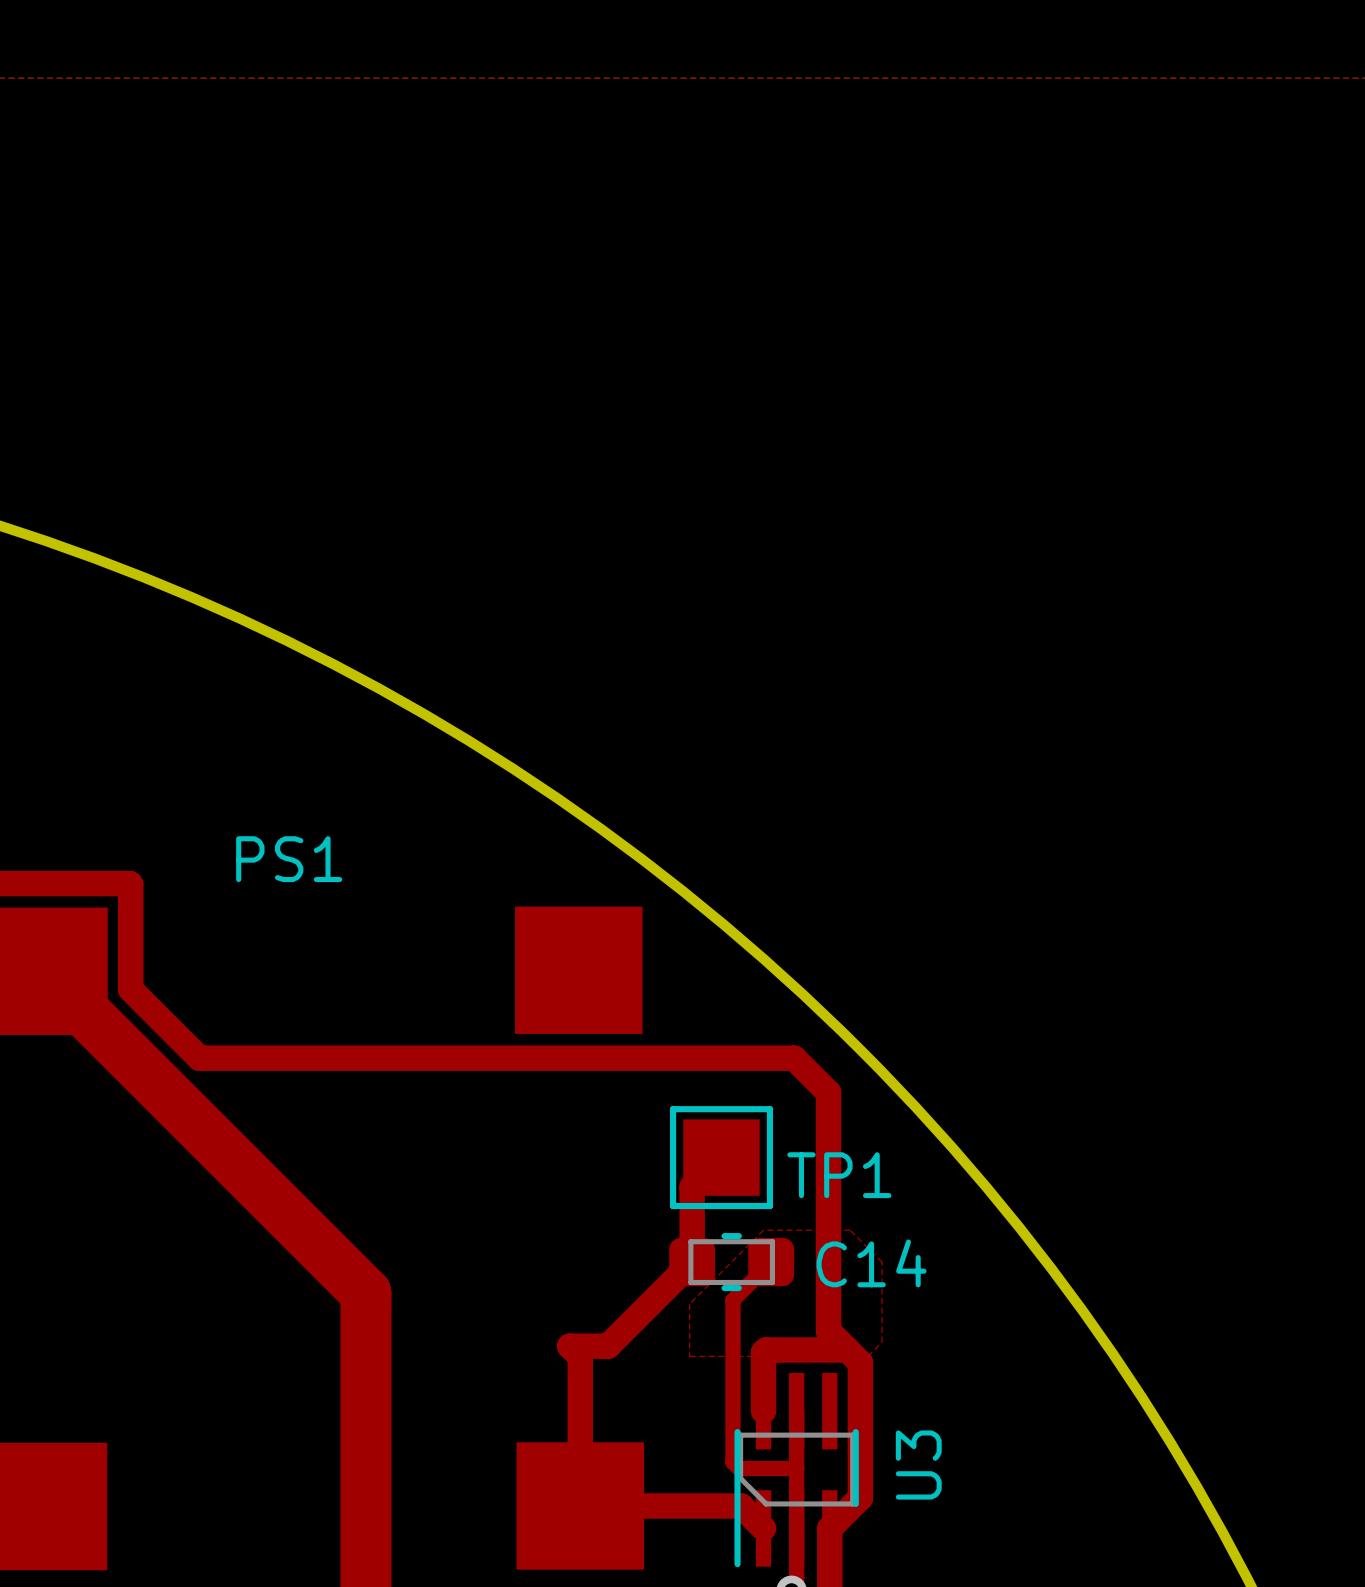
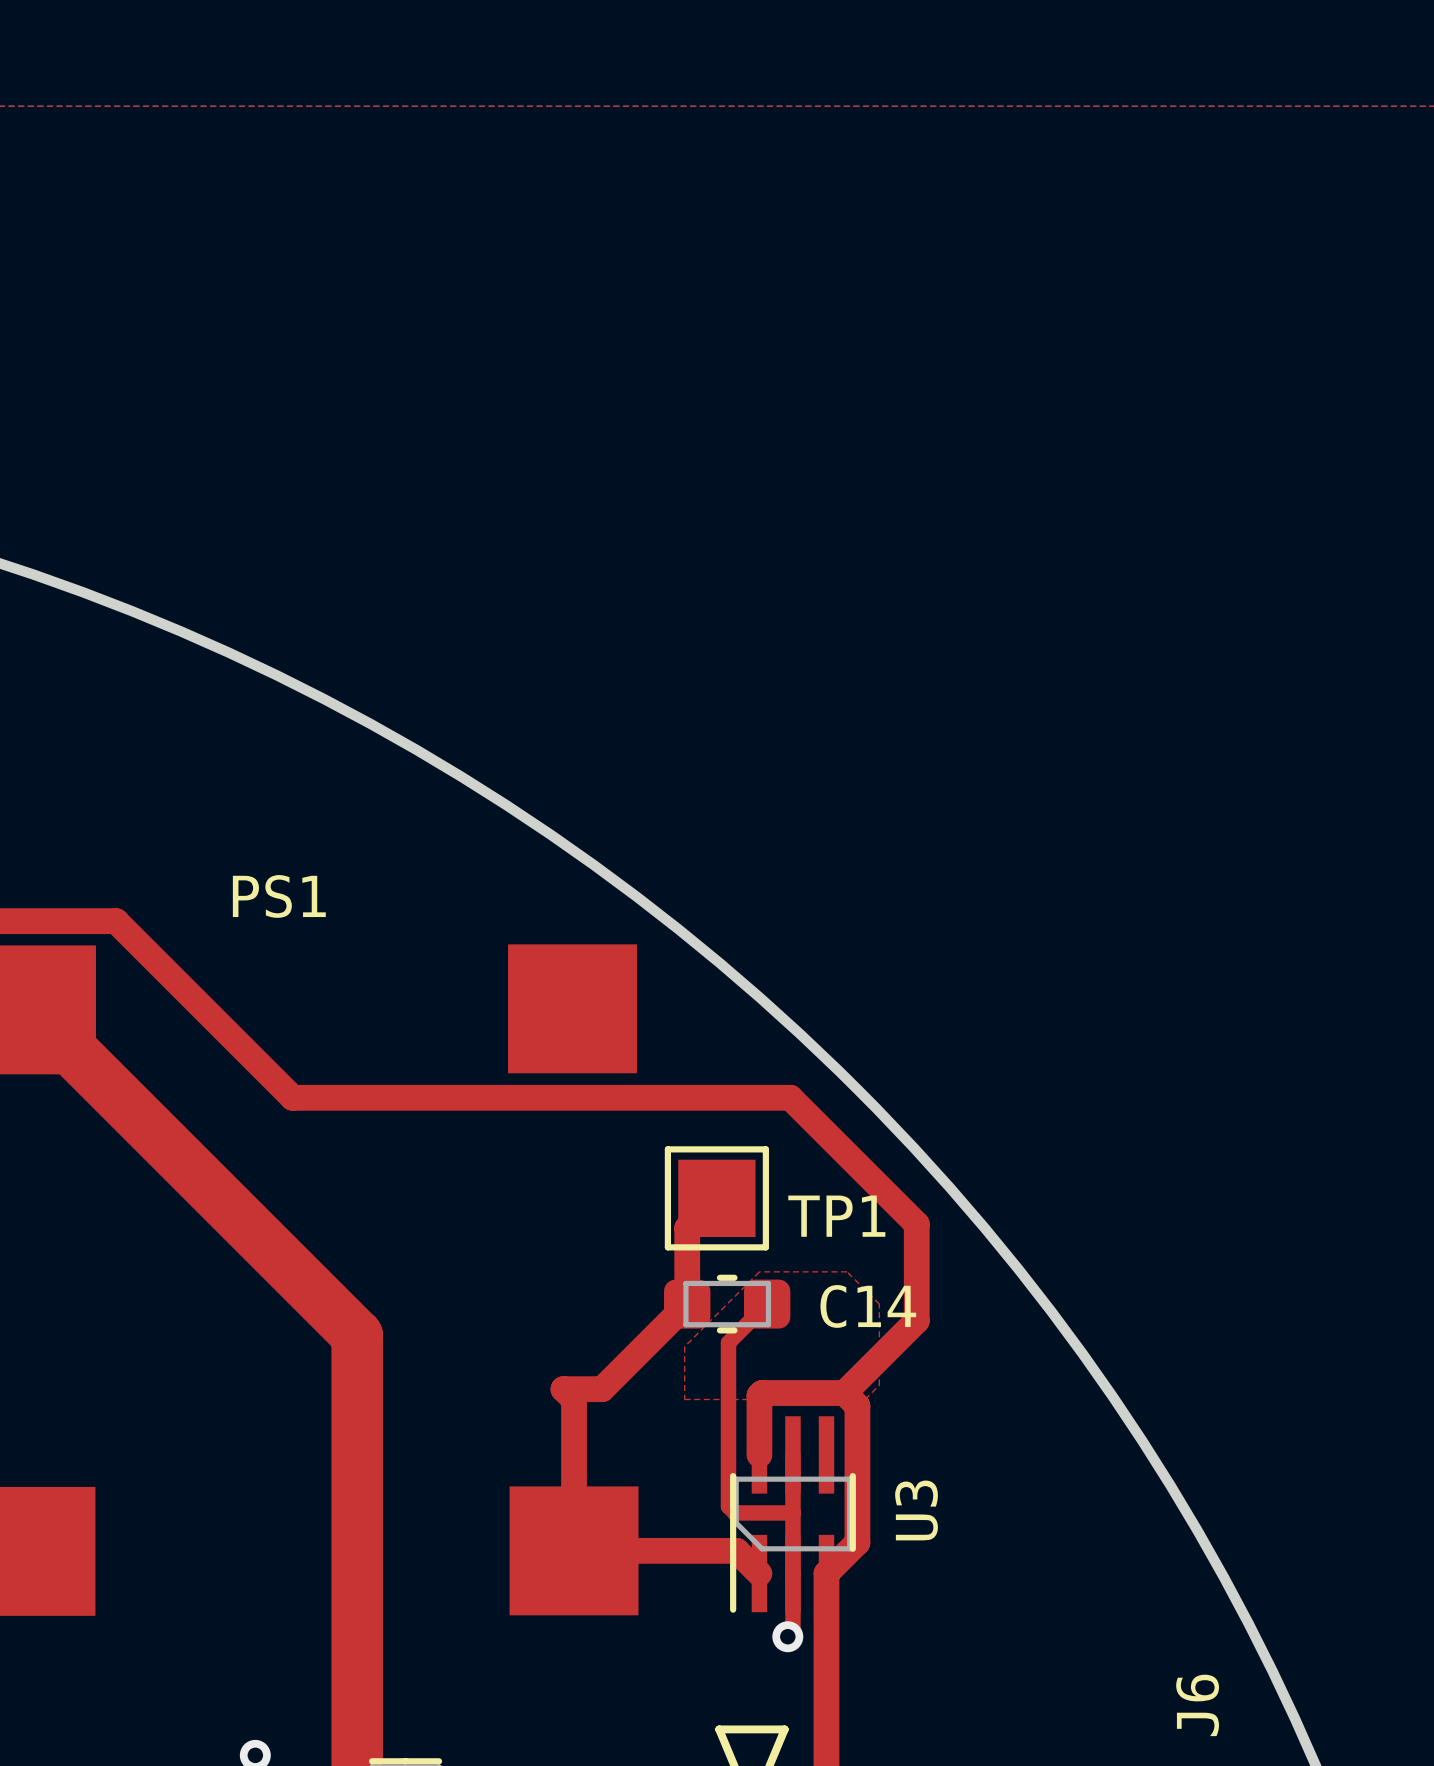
top track: (127, 883) (130, 884) (130, 989) (199, 1058) (302, 1058) -> (116, 921) (292, 1097)
top track: (828, 1092) (828, 1330) (847, 1350) -> (825, 1132) (916, 1224) (916, 1320) (844, 1393)

